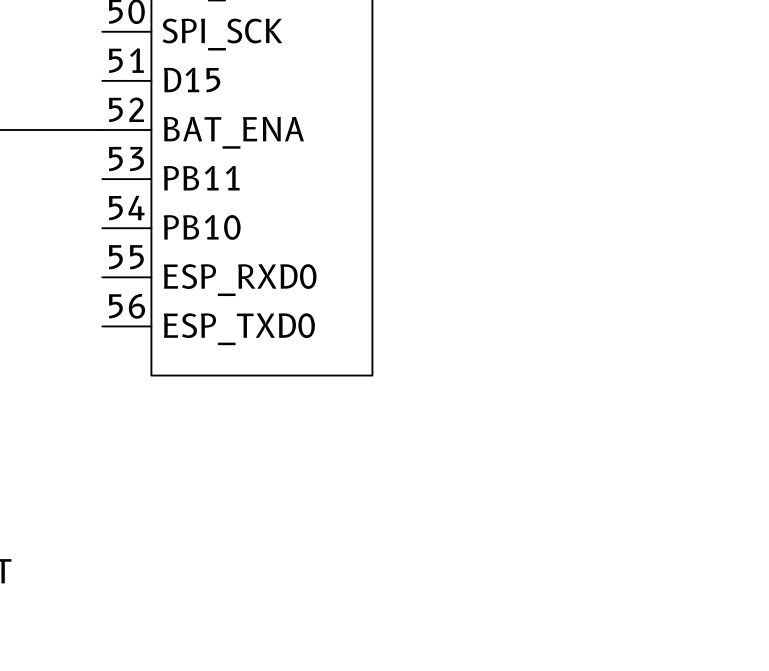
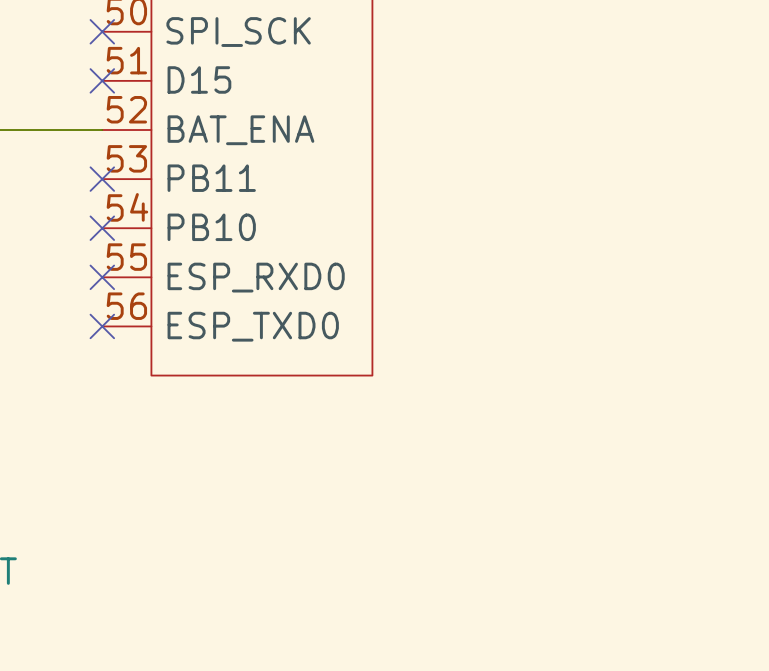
no-connect mark: none -> (102, 31)
no-connect mark: none -> (102, 80)
no-connect mark: none -> (102, 179)
no-connect mark: none -> (102, 228)
no-connect mark: none -> (102, 277)
no-connect mark: none -> (102, 326)

